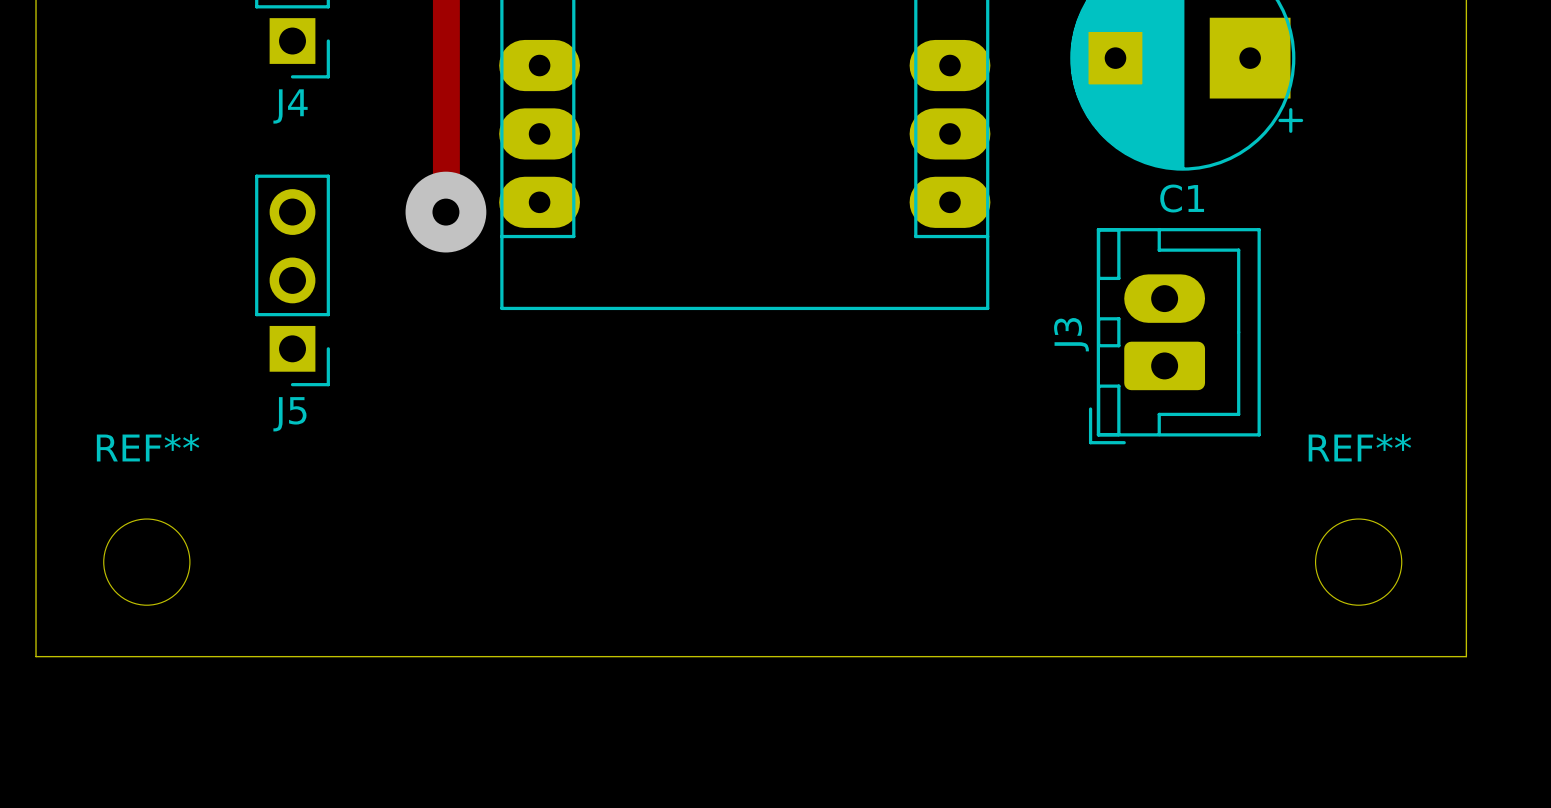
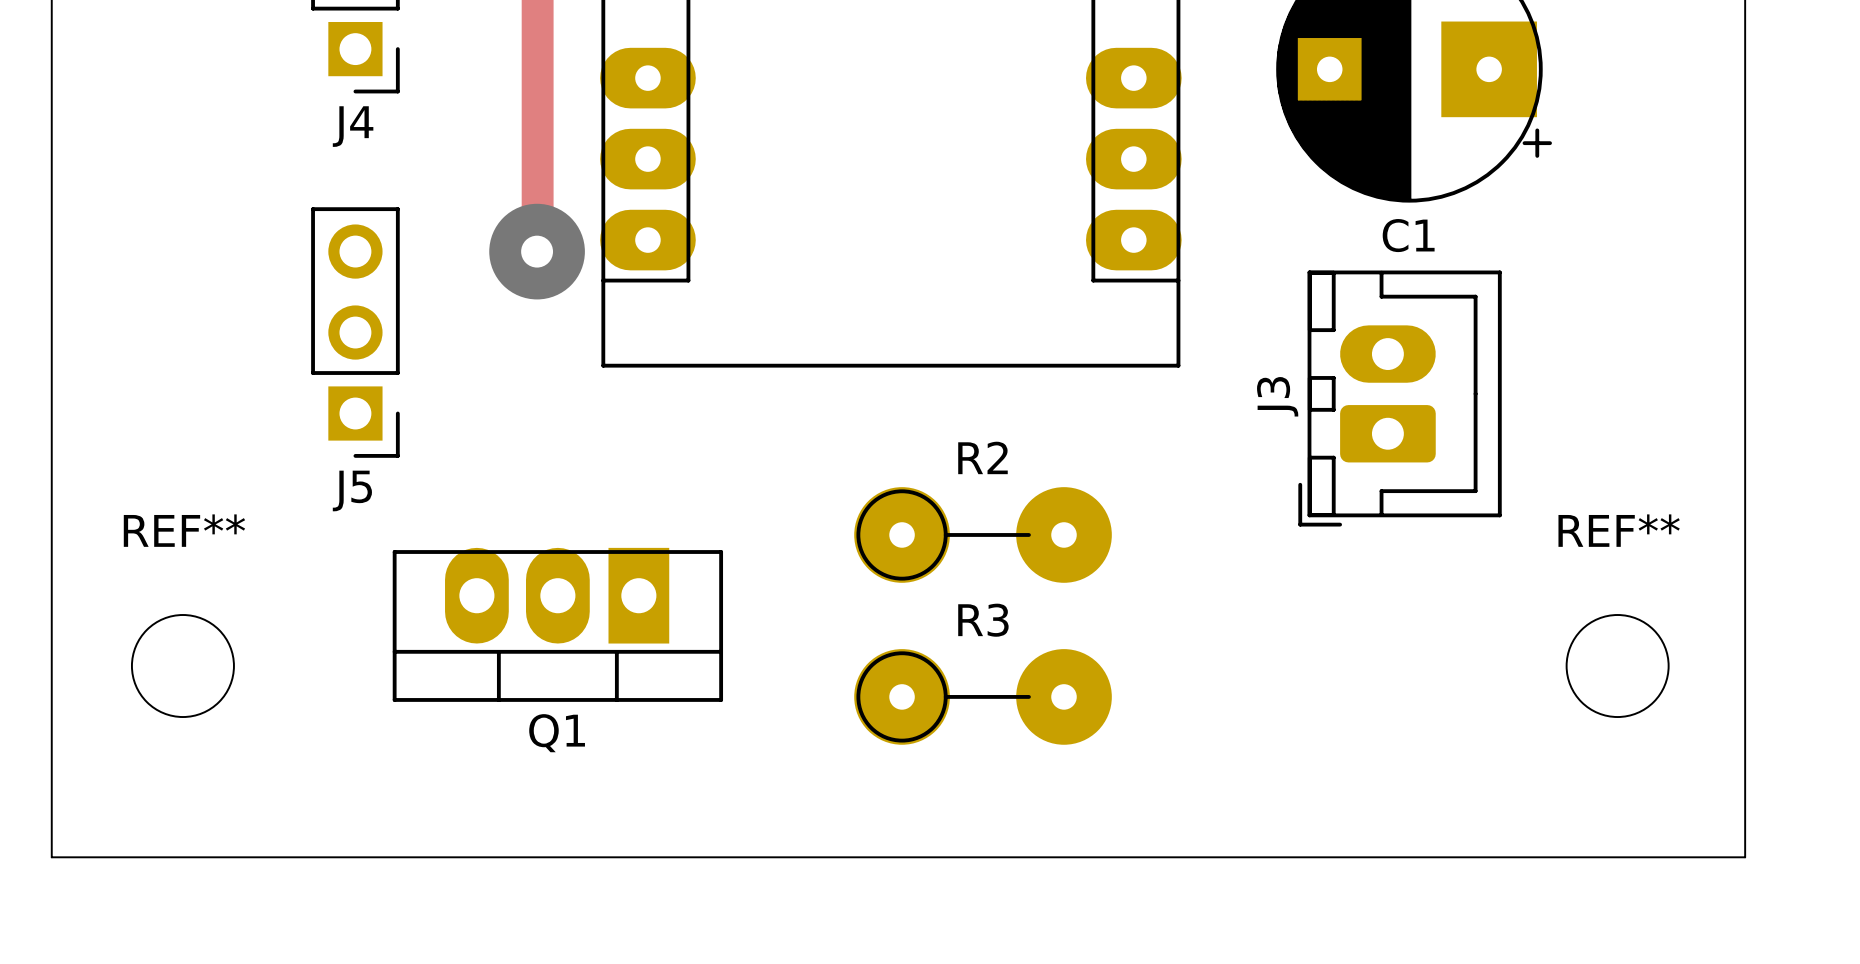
R2: none -> (983, 534)
Q1: none -> (557, 624)
R3: none -> (983, 696)
board edge: (36, 656) (1466, 656) -> (51, 777) (51, 857) (1745, 857) (1745, 777)

